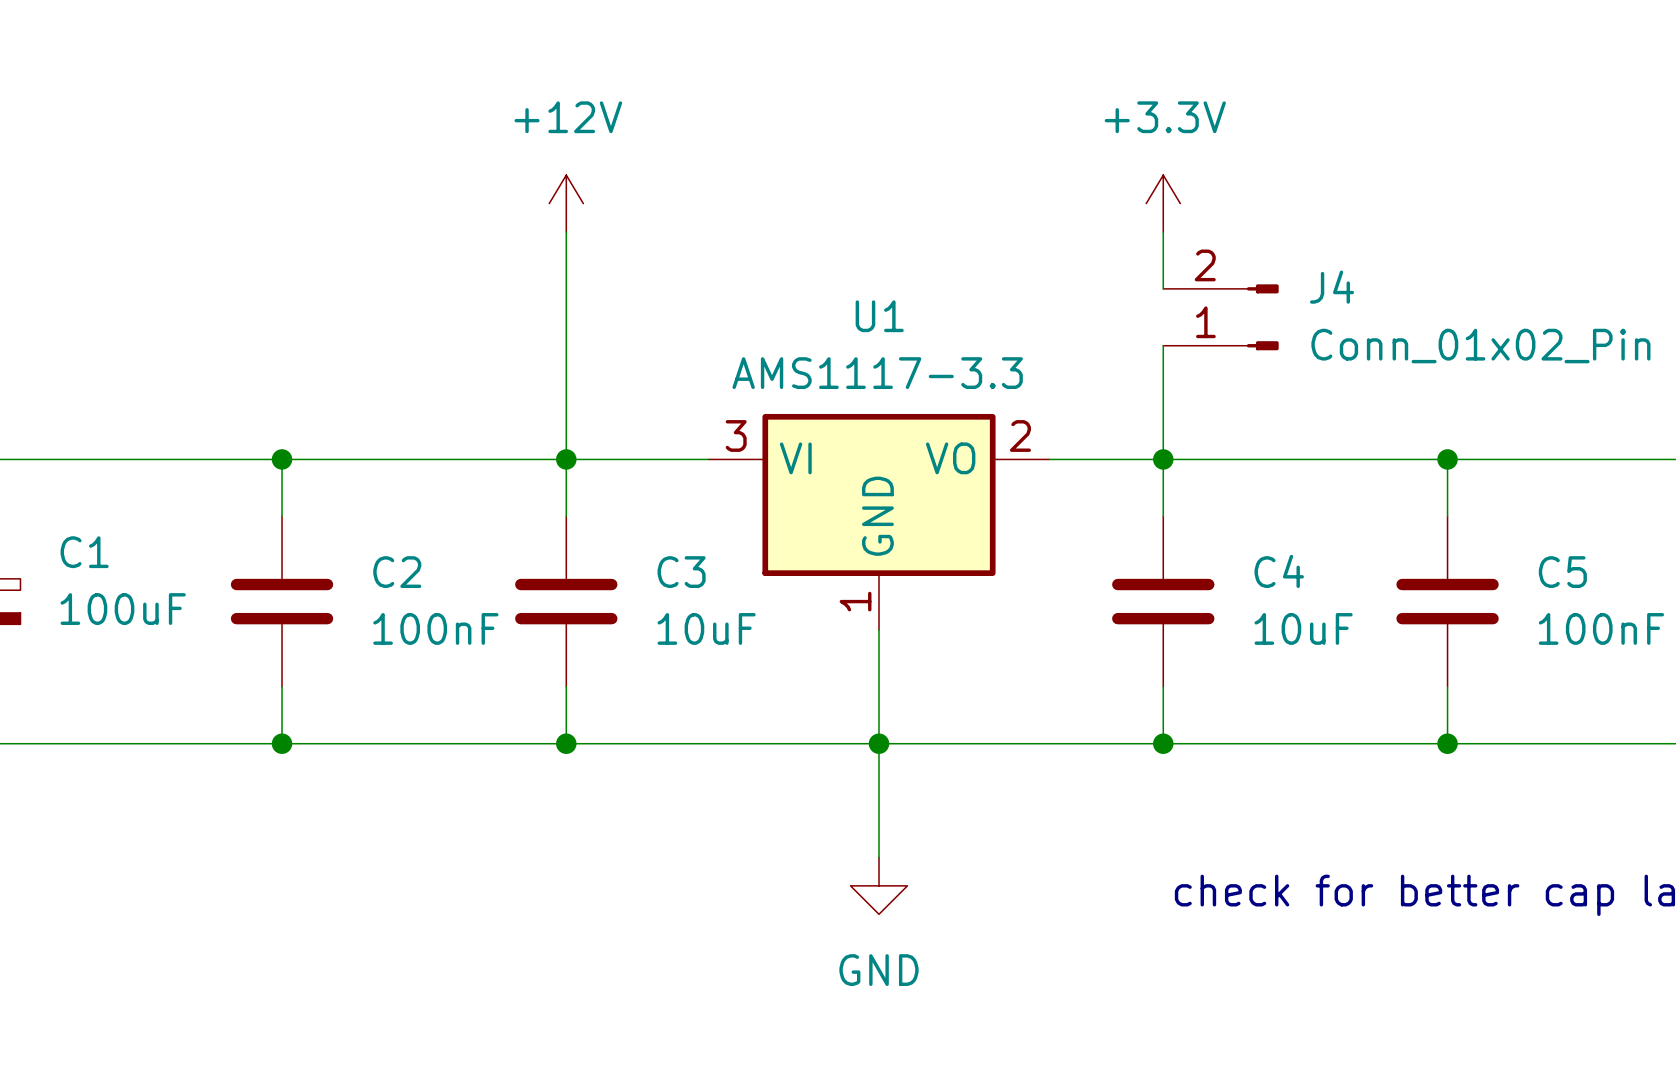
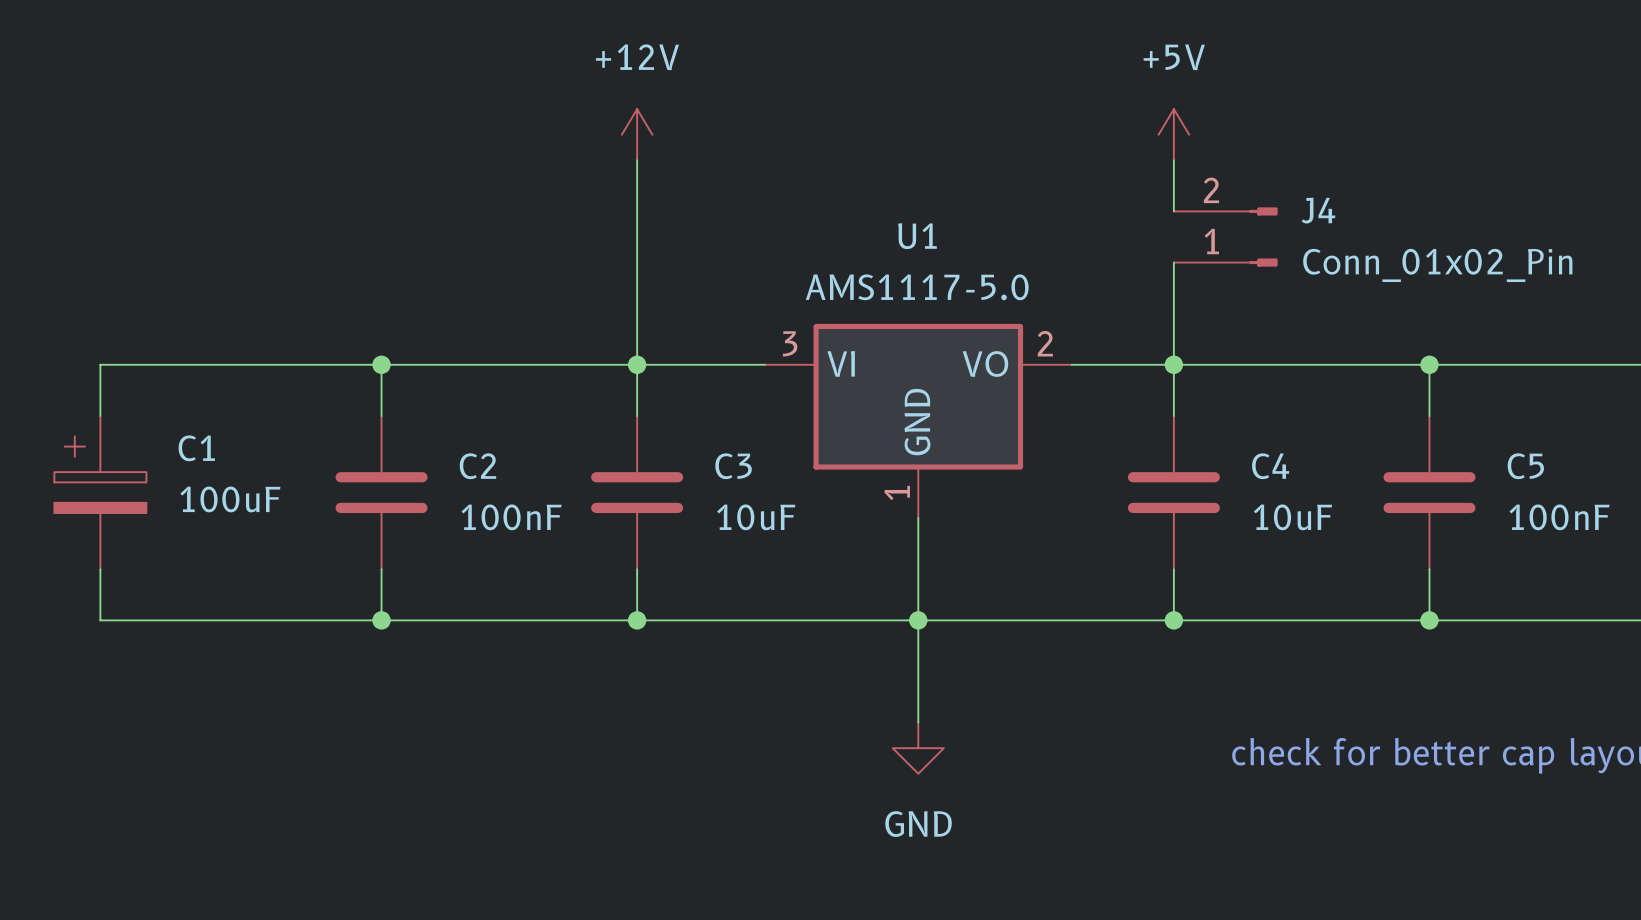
power symbol: +3.3V (1163, 203) -> +5V (1173, 134)
U1 value: AMS1117-3.3 (877, 373) -> AMS1117-5.0 (917, 287)

